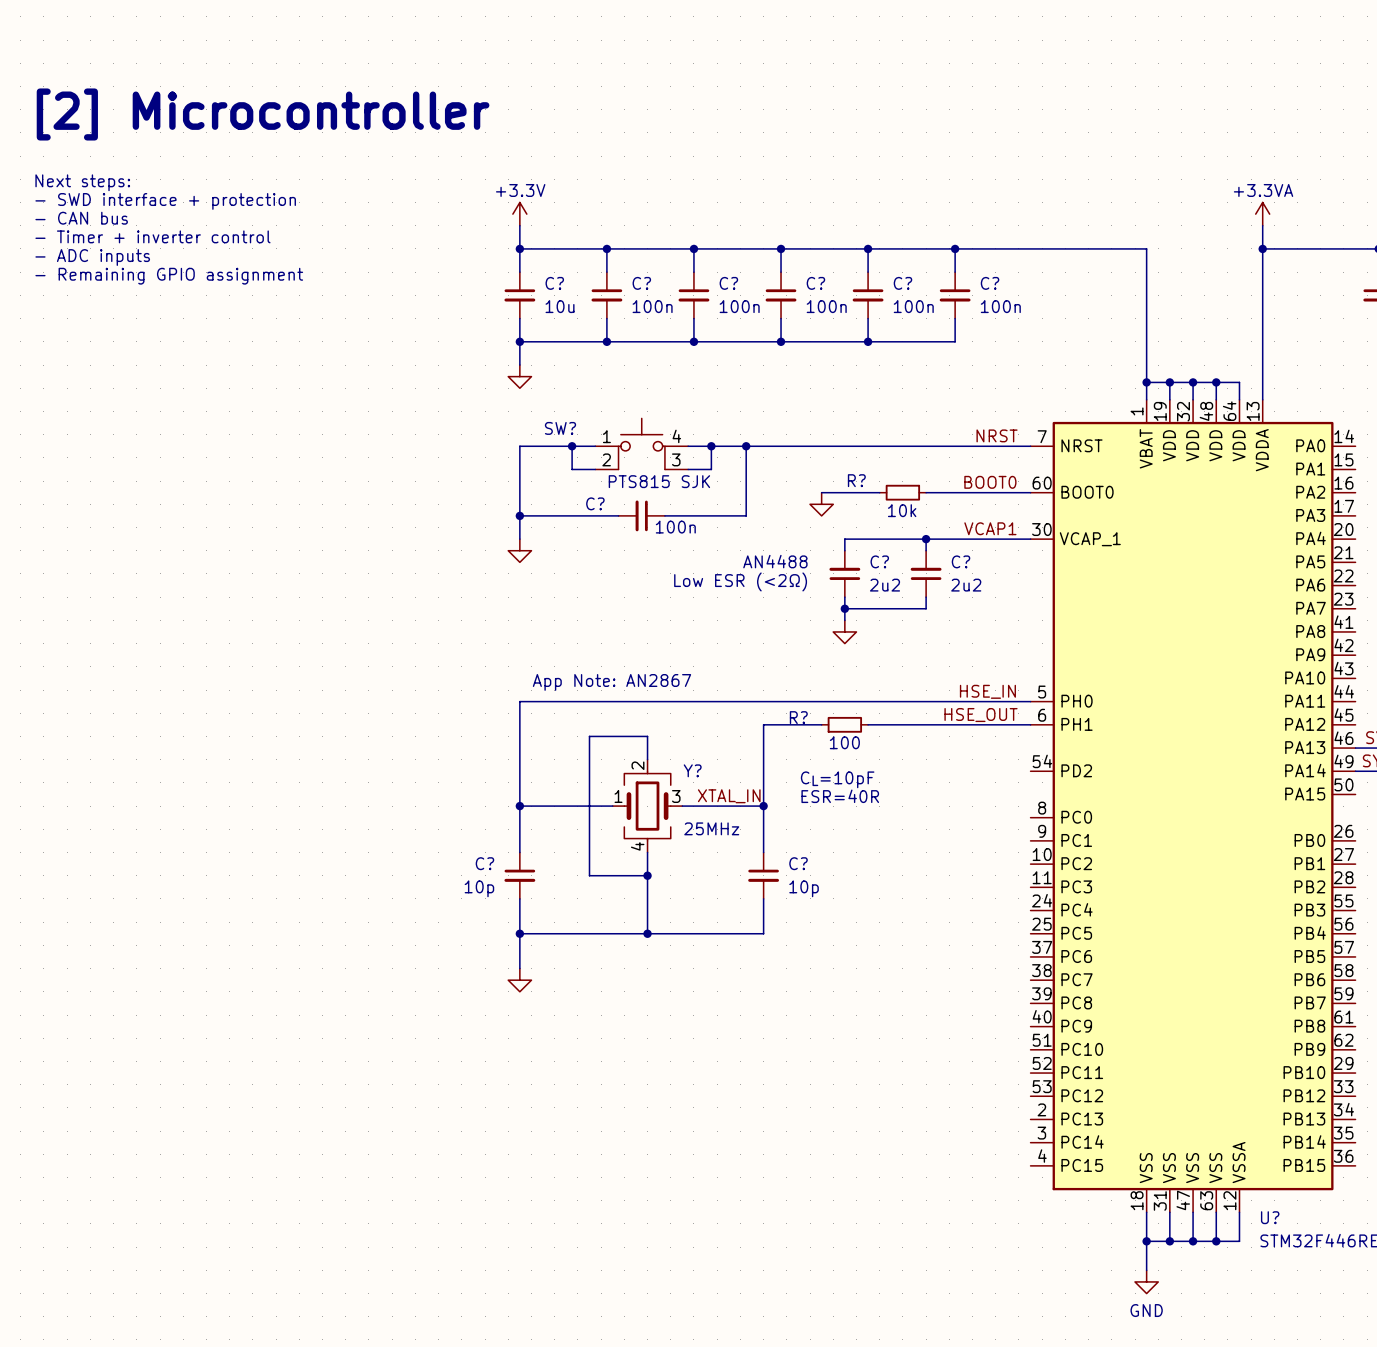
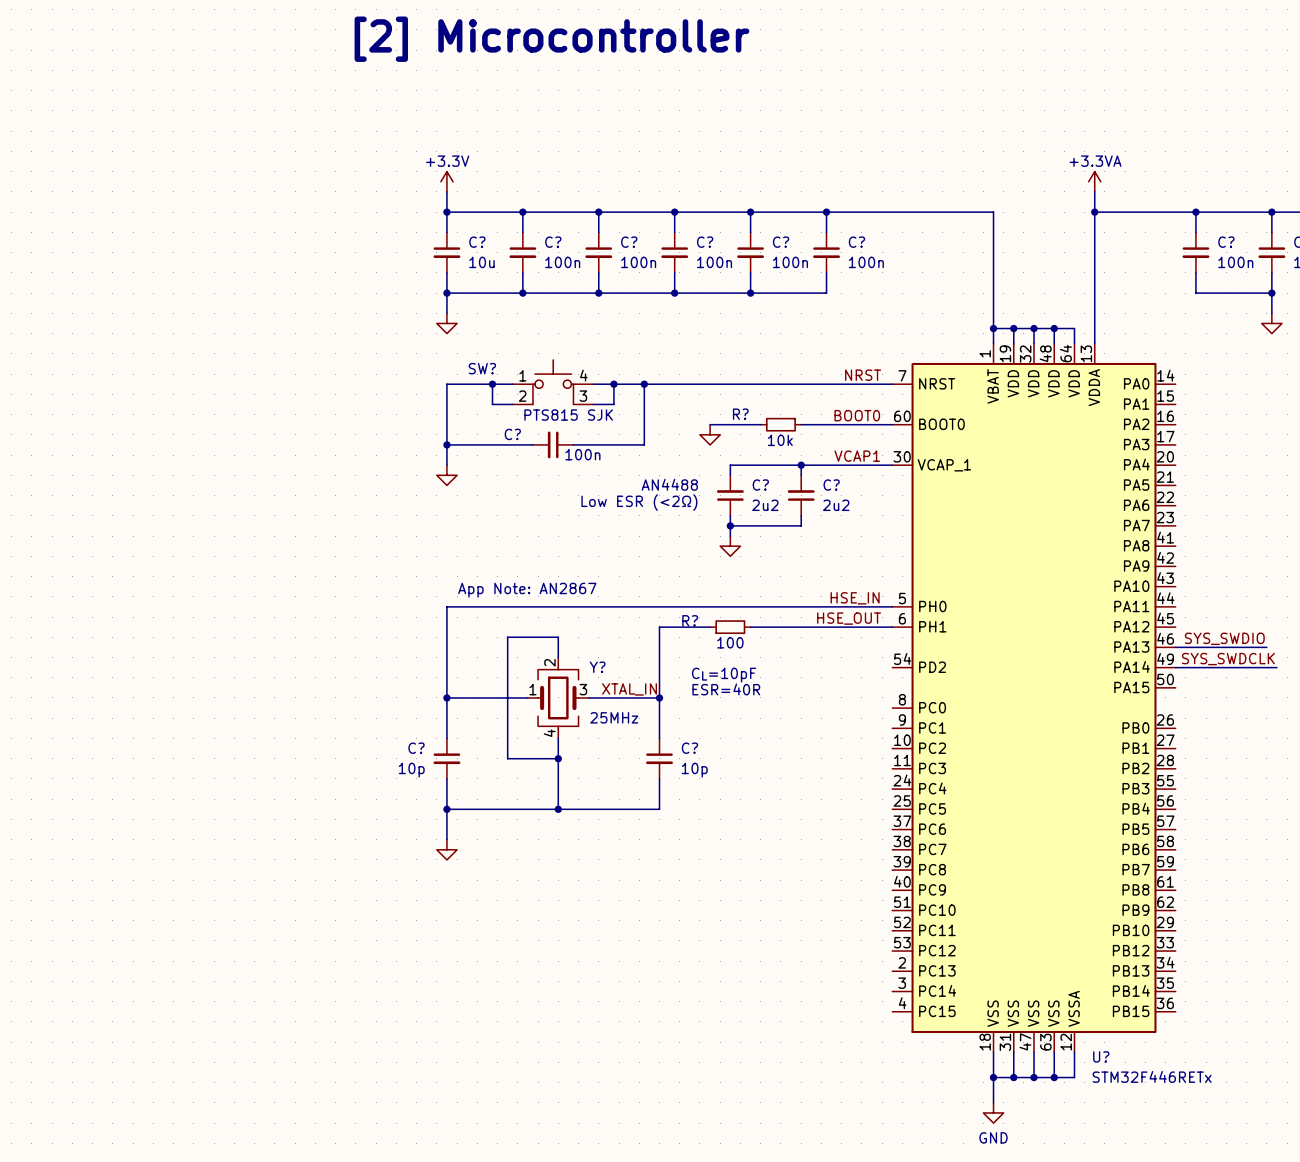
text: none -> [2] Microcontroller (551, 39)
text: [2] Microcontroller (263, 114) -> none
text: Next steps: (82, 182) -> none
text: - SWD interface + protection (165, 201) -> none
text: - CAN bus (81, 218) -> none
text: - Timer + inverter control (152, 236) -> none
text: - ADC inputs (92, 257) -> none
text: - Remaining GPIO assignment (169, 276) -> none

